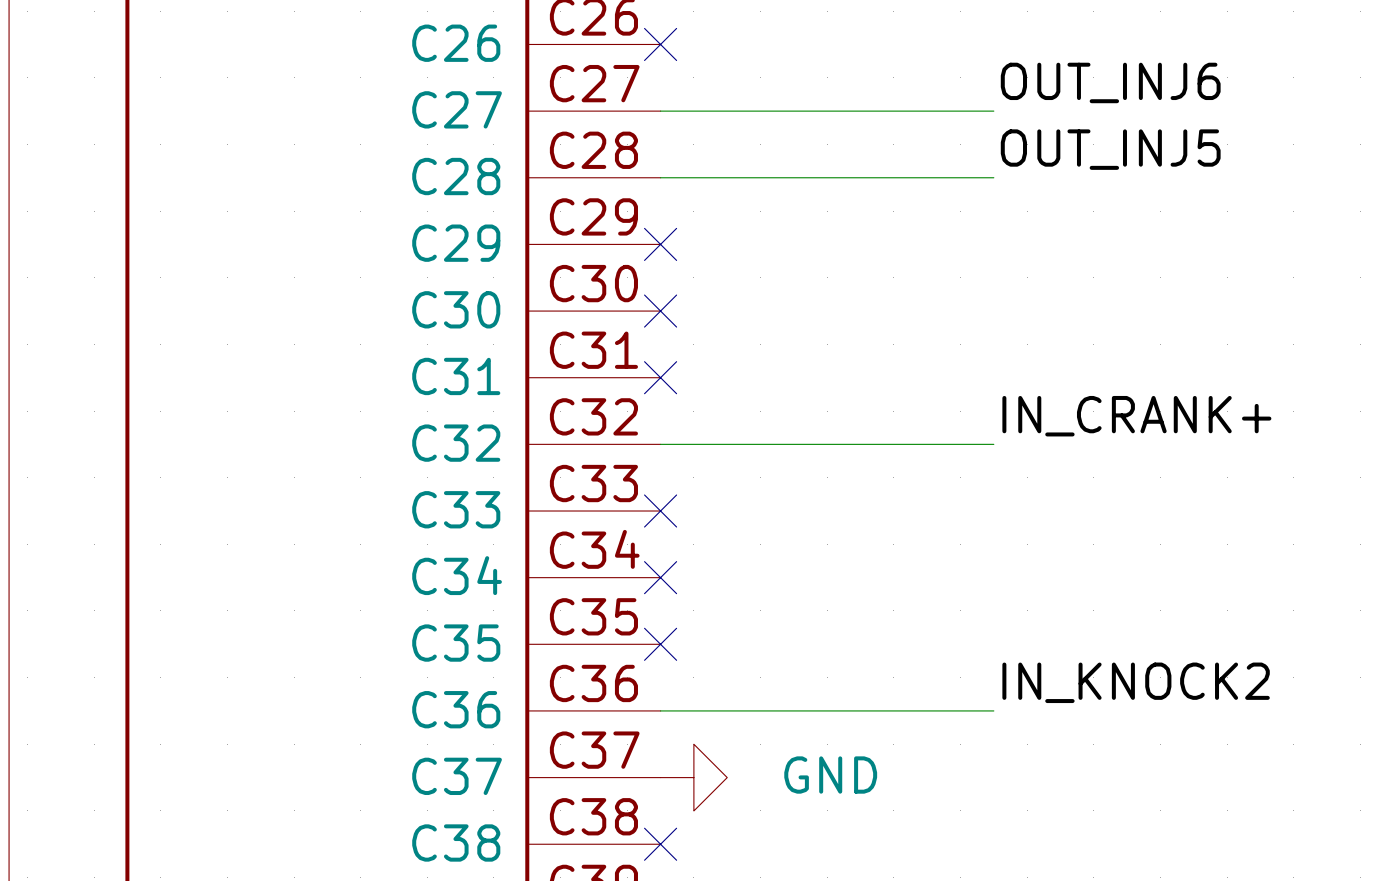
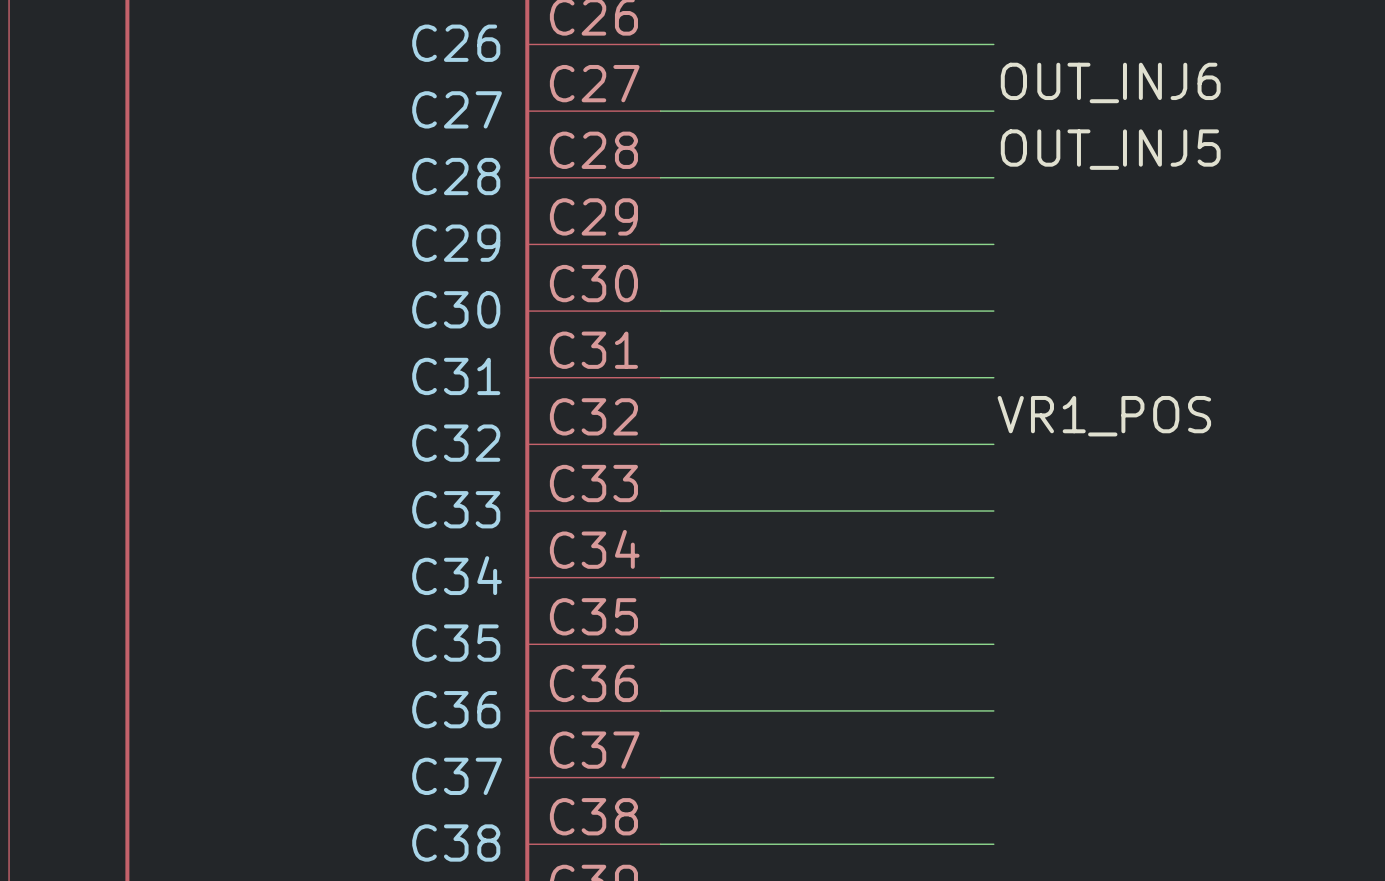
wire: none -> (660, 44) (993, 44)
no-connect mark: (660, 44) -> none
wire: none -> (660, 244) (993, 244)
no-connect mark: (660, 244) -> none
wire: none -> (660, 311) (993, 311)
no-connect mark: (660, 311) -> none
wire: none -> (660, 377) (993, 377)
no-connect mark: (660, 377) -> none
label: IN_CRANK+ (1136, 416) -> VR1_POS (1104, 416)
wire: none -> (660, 511) (993, 511)
no-connect mark: (660, 511) -> none
wire: none -> (660, 577) (993, 577)
no-connect mark: (660, 577) -> none
wire: none -> (660, 644) (993, 644)
no-connect mark: (660, 644) -> none
label: IN_KNOCK2 (1136, 682) -> none
wire: none -> (660, 777) (993, 777)
power symbol: GND (693, 777) -> none
wire: none -> (660, 844) (993, 844)
no-connect mark: (660, 844) -> none

